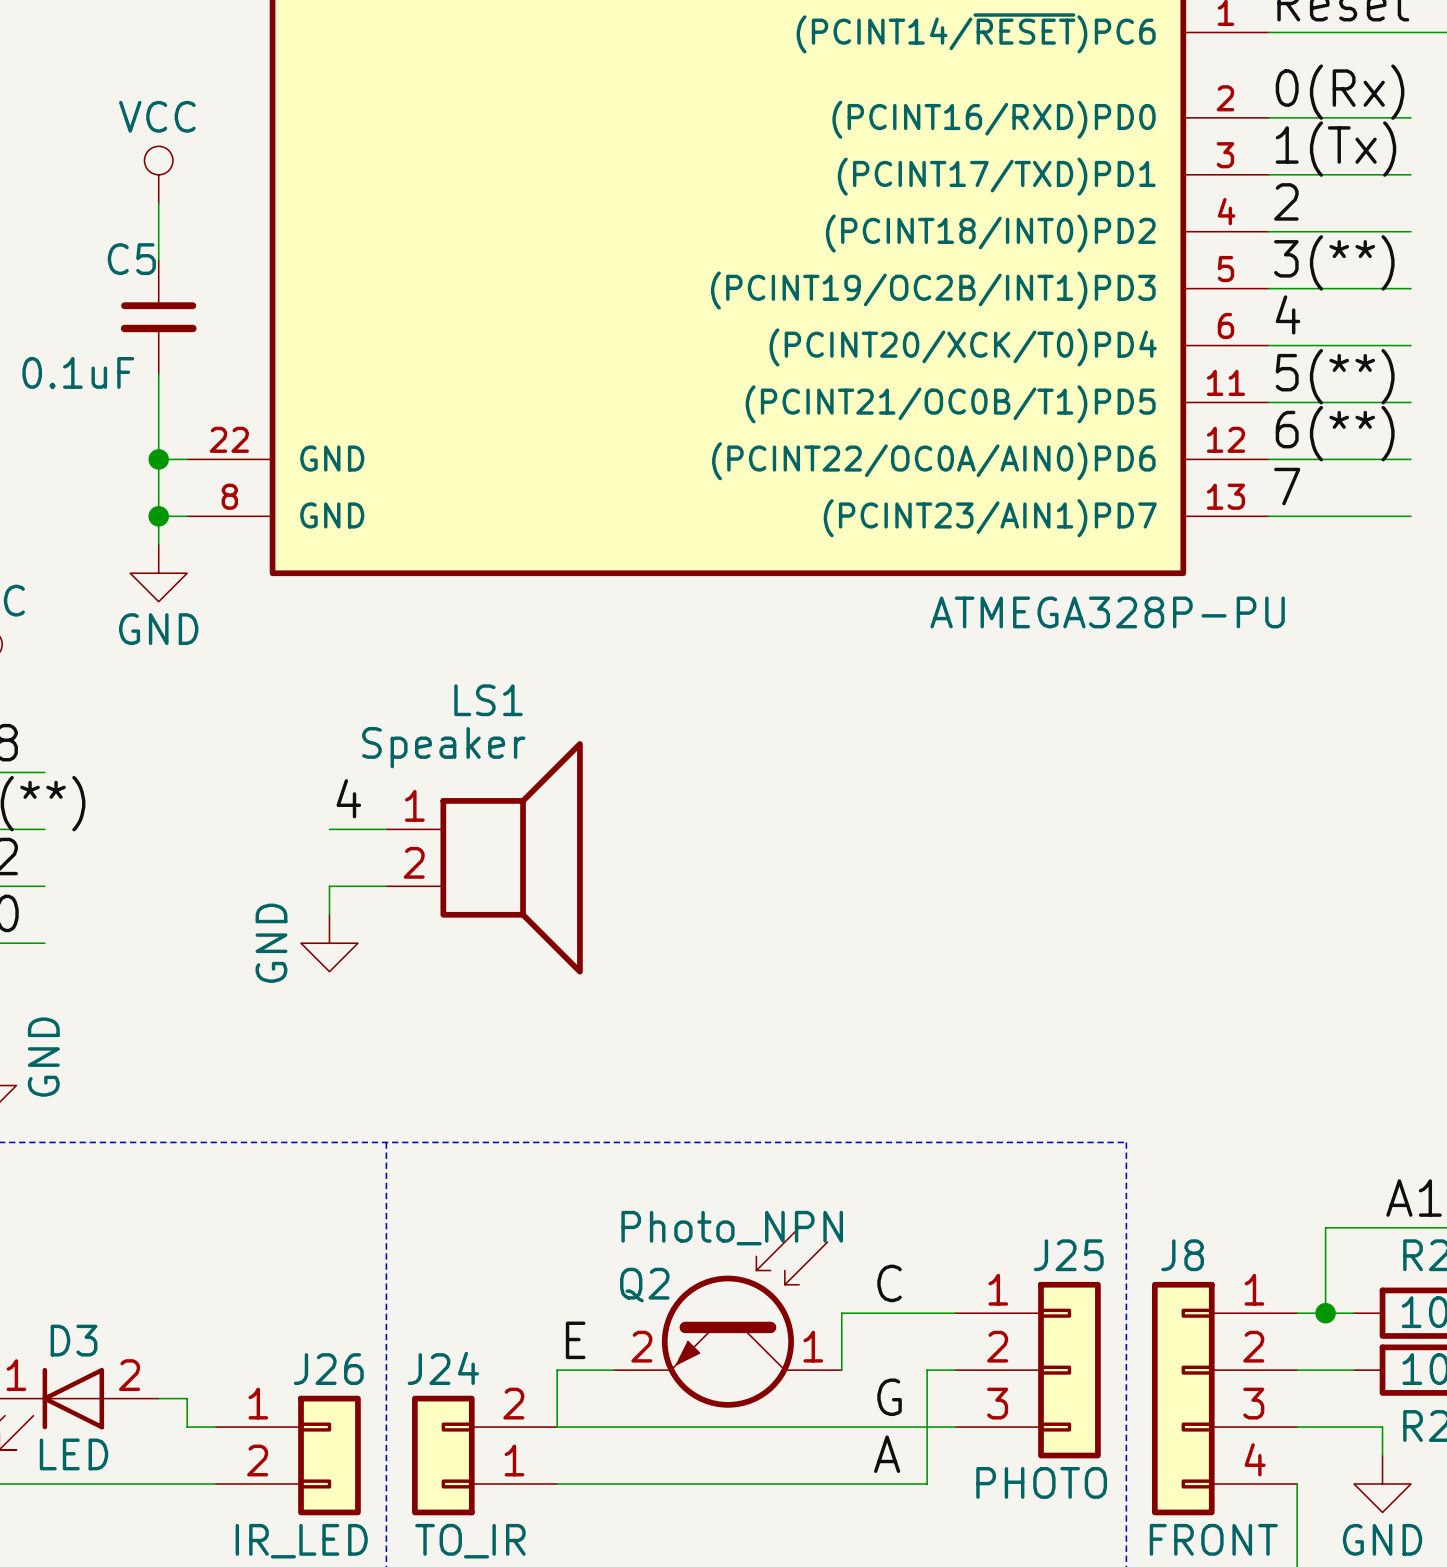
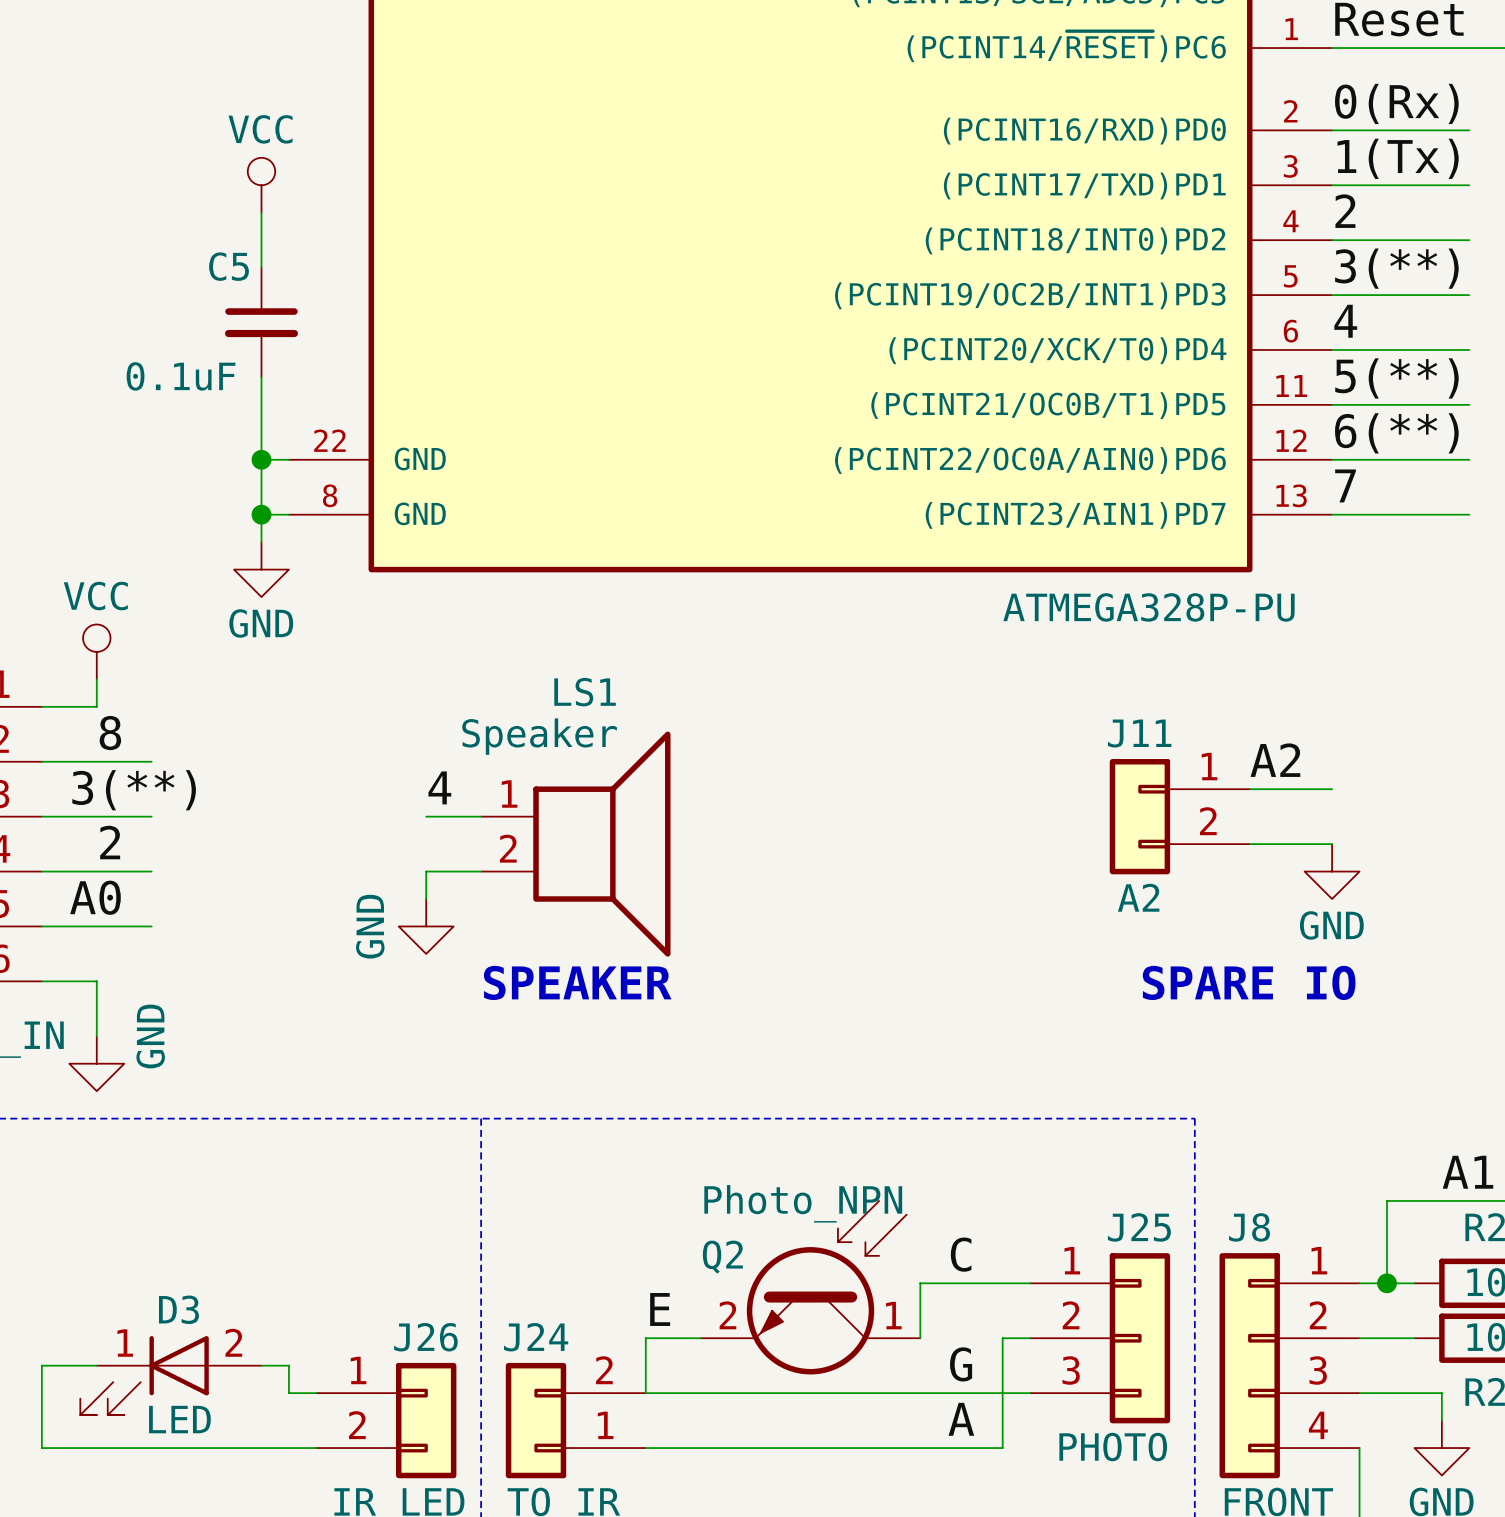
label: none -> A2 (1275, 760)
wire: none -> (1249, 789) (1332, 789)
J11: none -> A2 (1179, 816)
wire: none -> (1249, 844) (1332, 844)
power symbol: none -> GND (1332, 871)
text: none -> SPEAKER (577, 982)
text: none -> SPARE IO (1249, 982)

